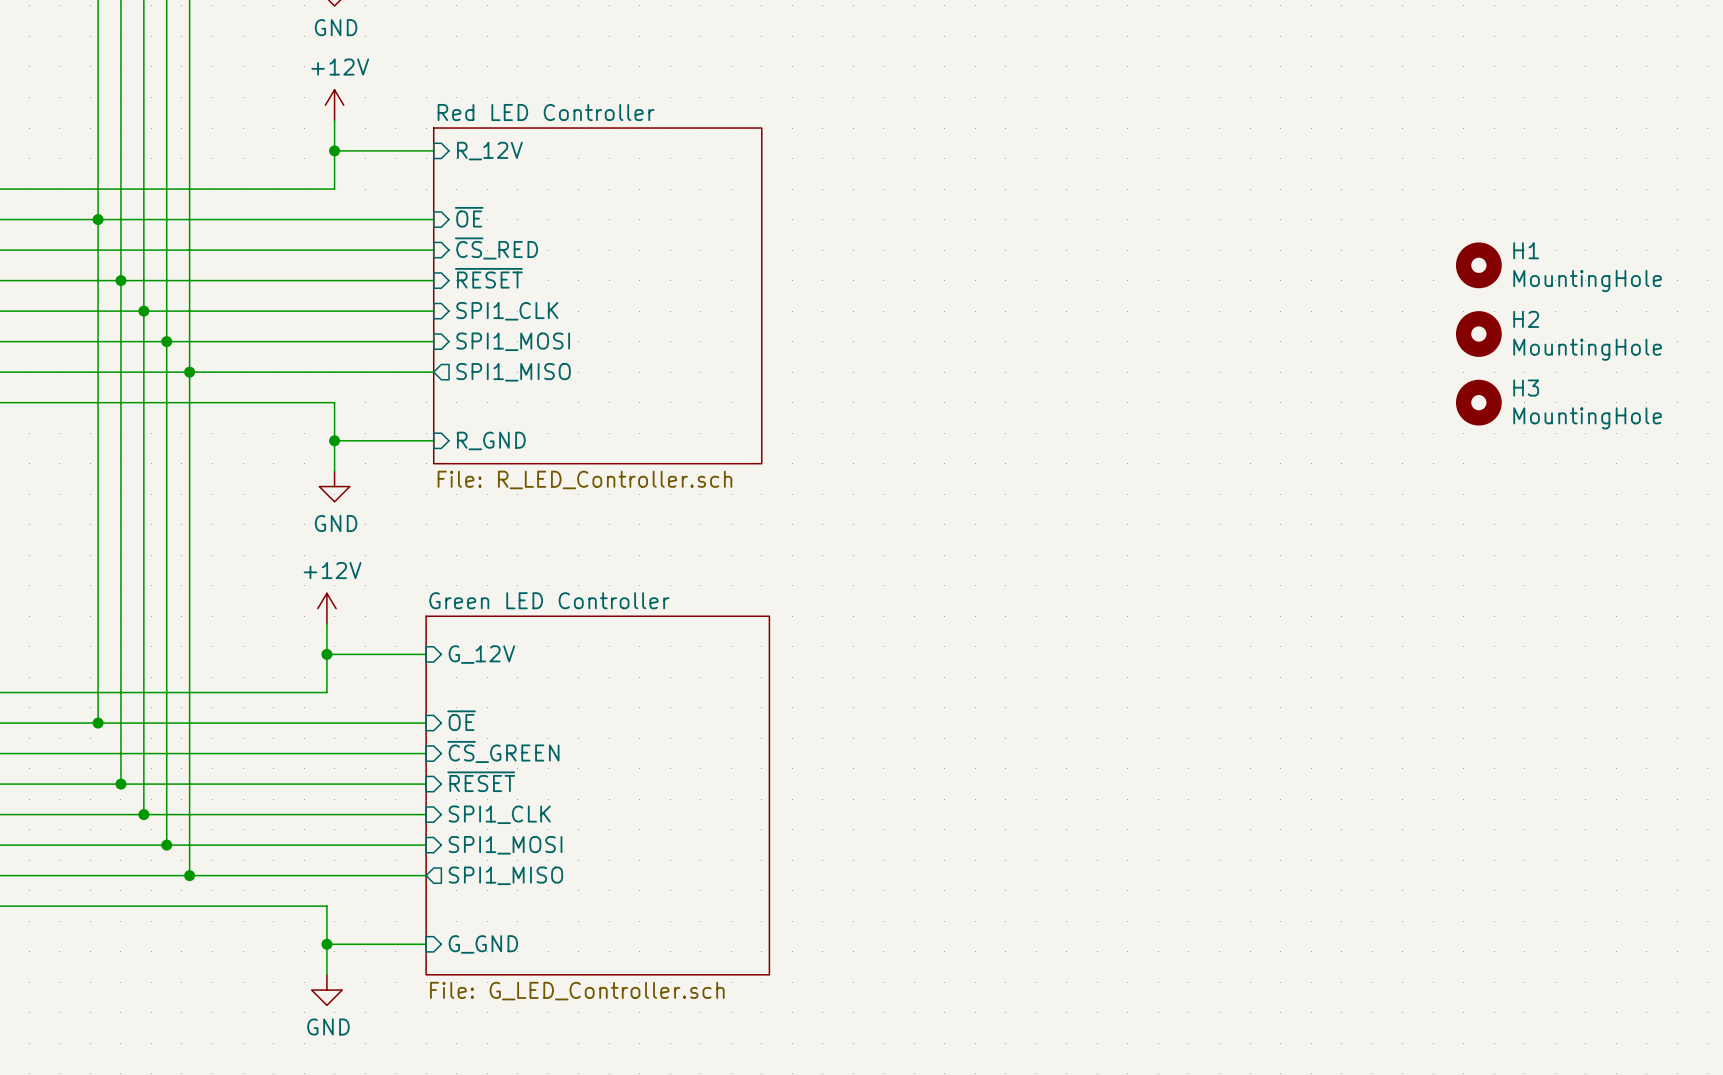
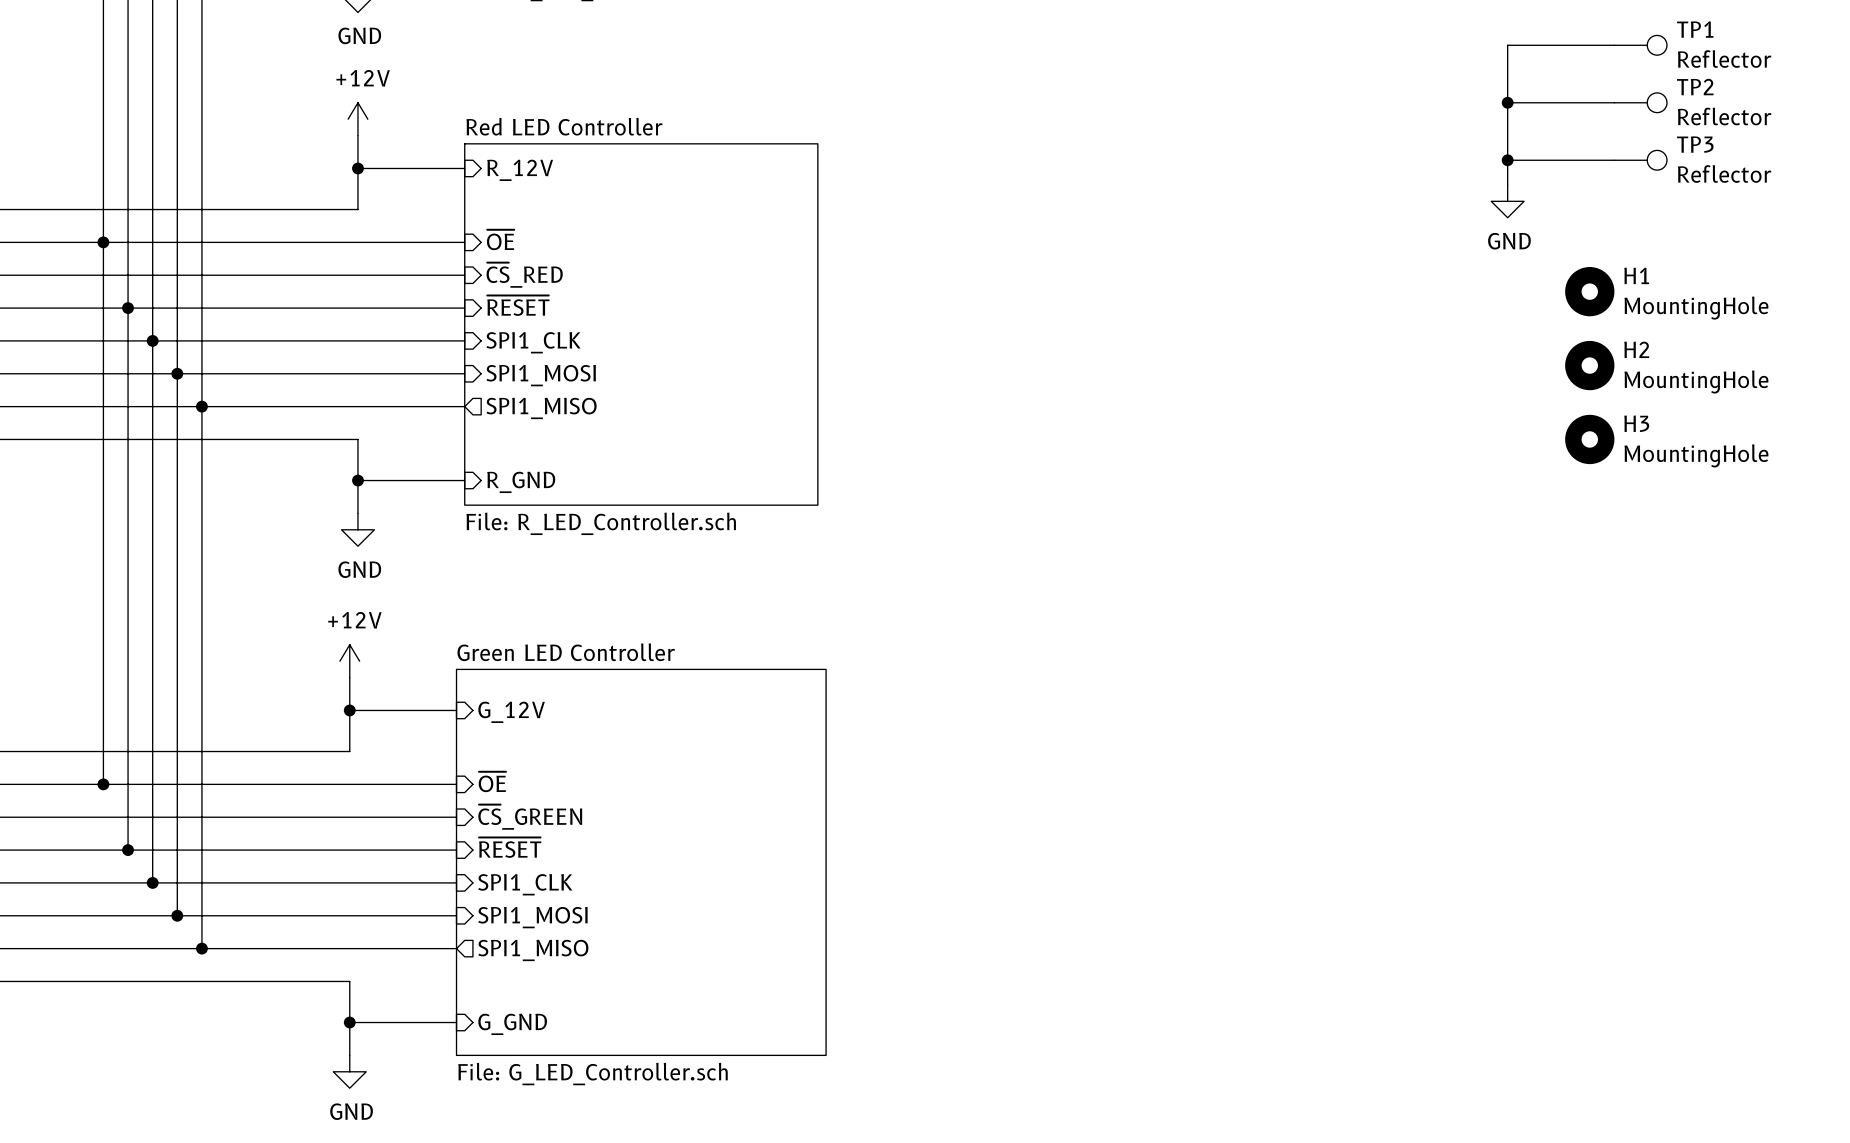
wire: none -> (1614, 45) (1507, 45) (1507, 184)
TP1: none -> Reflector (1640, 45)
wire: none -> (1507, 102) (1614, 102)
junction: none -> (1507, 102)
TP2: none -> Reflector (1640, 102)
wire: none -> (1507, 160) (1614, 160)
junction: none -> (1507, 160)
TP3: none -> Reflector (1640, 160)
power symbol: none -> GND (1507, 201)

